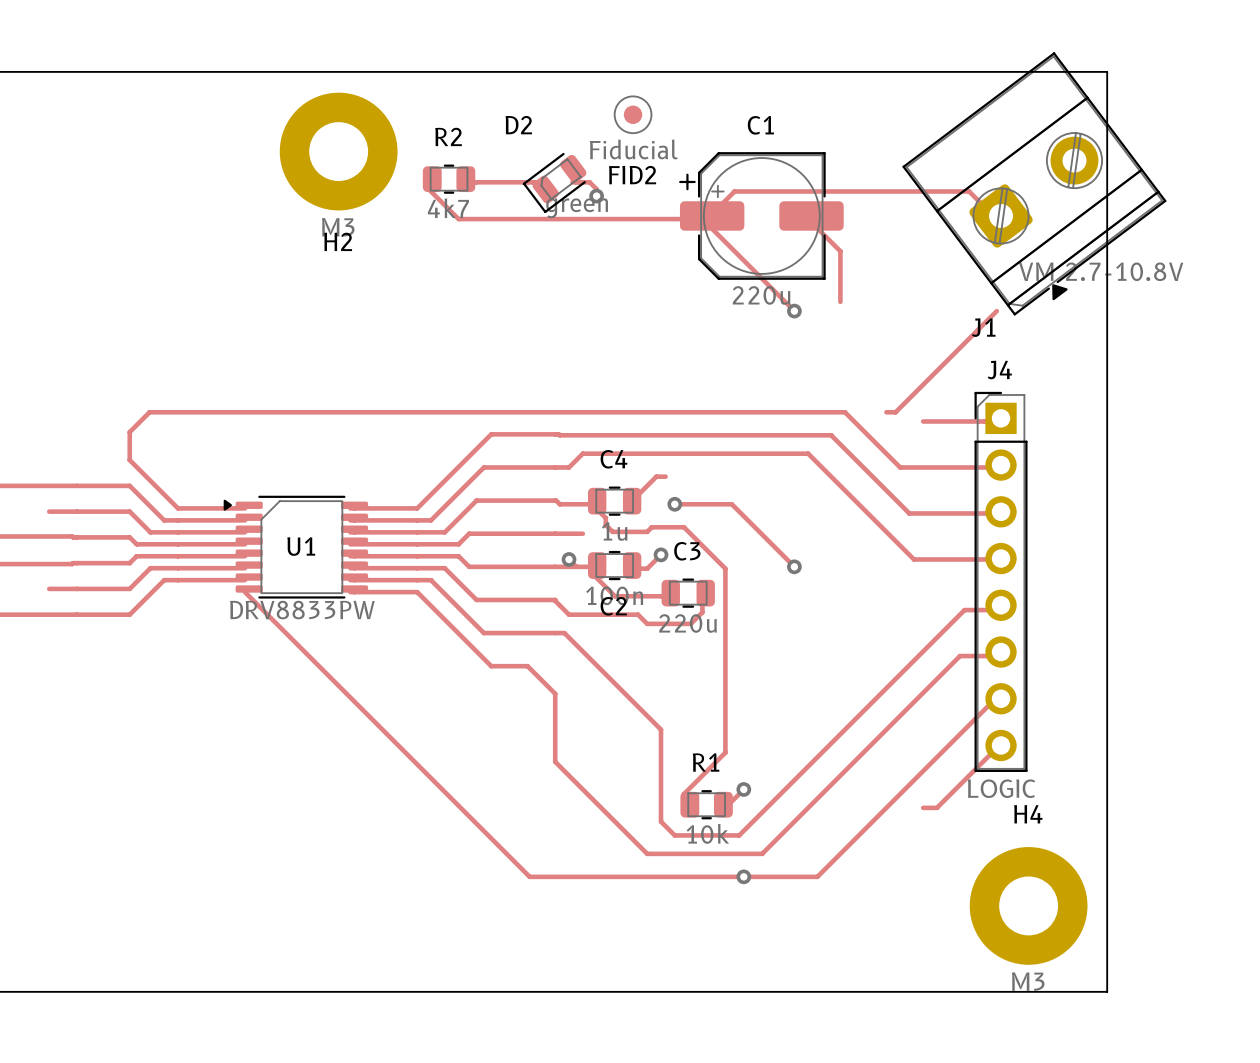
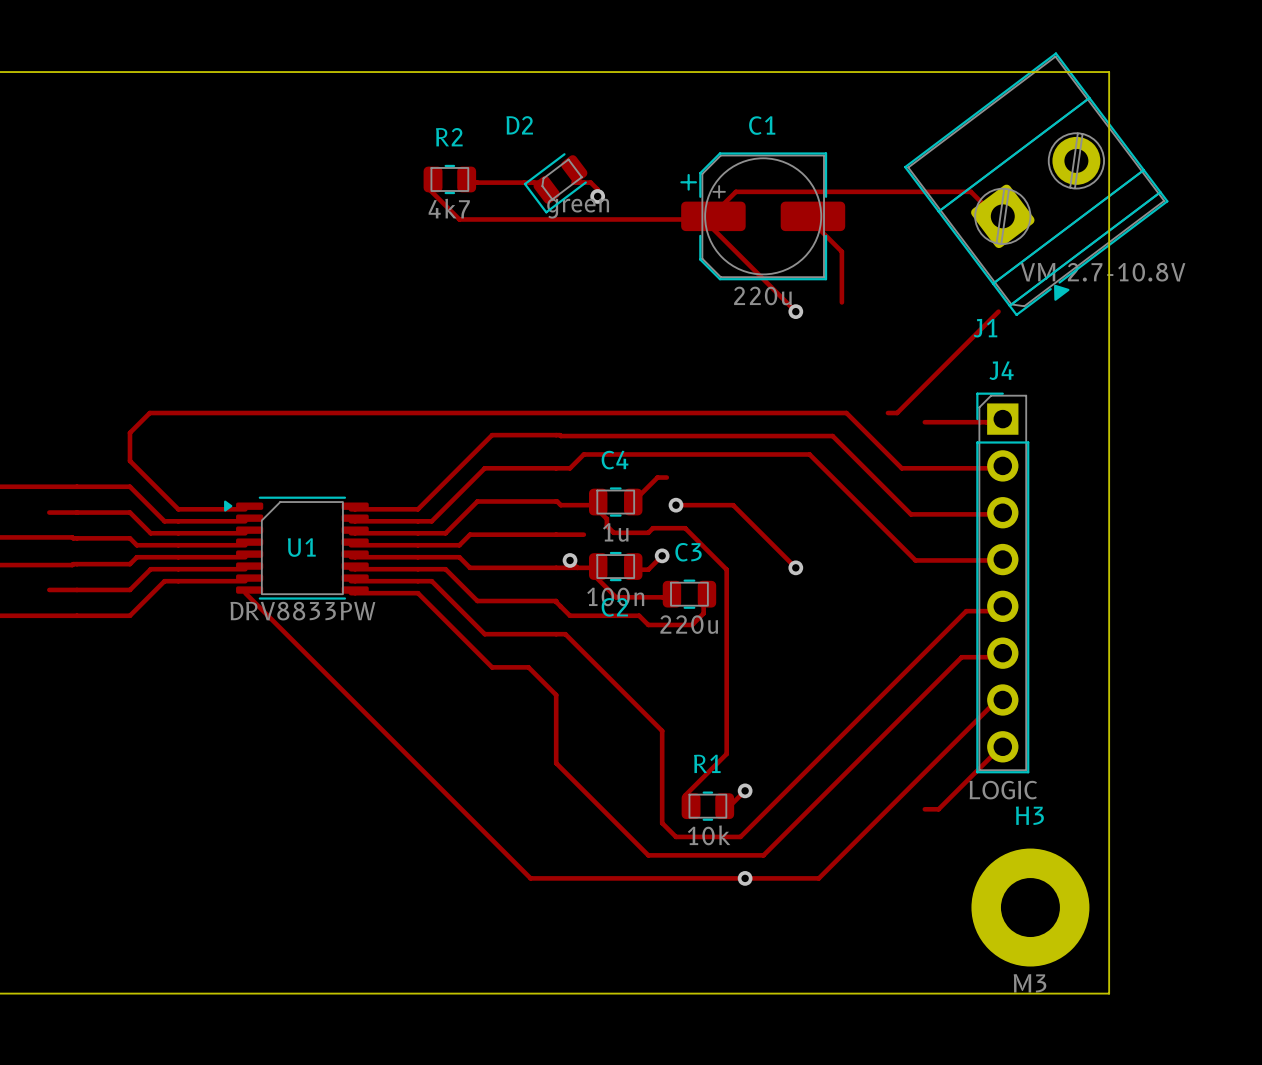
FID2: Fiducial (633, 114) -> none
H2: M3 (338, 151) -> none
H4 name: H4 (1028, 814) -> H3 (1029, 815)

